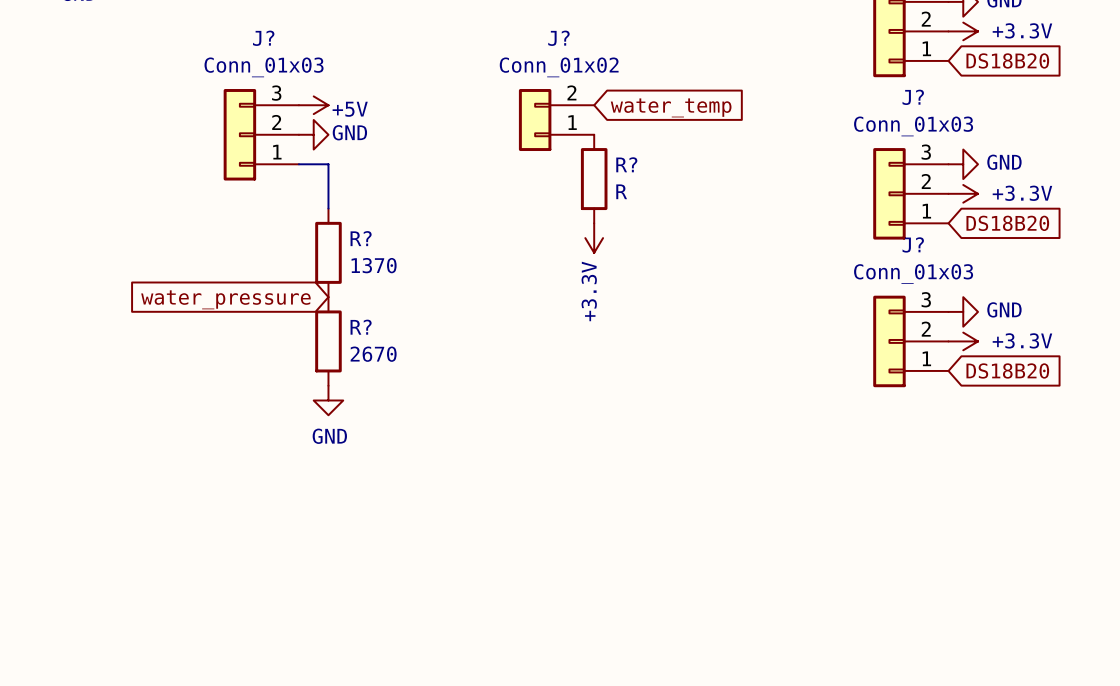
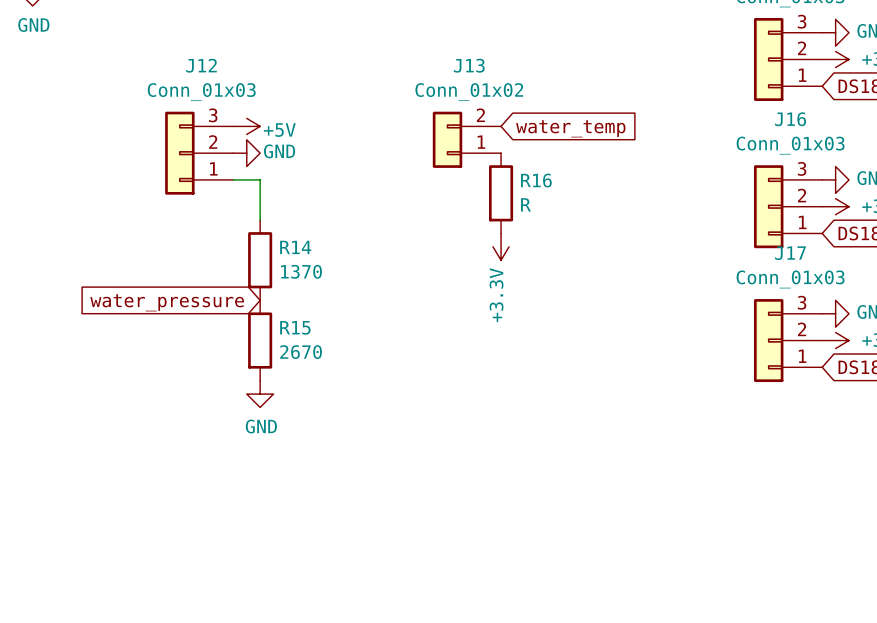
J? name: J? (263, 38) -> J12 (201, 65)
J? name: J? (558, 38) -> J13 (469, 65)
J? name: J? (913, 97) -> J16 (790, 119)
R? name: R? (626, 164) -> R16 (536, 180)
R? name: R? (361, 238) -> R14 (295, 247)
J? name: J? (913, 244) -> J17 (790, 253)
R? name: R? (361, 327) -> R15 (295, 327)

